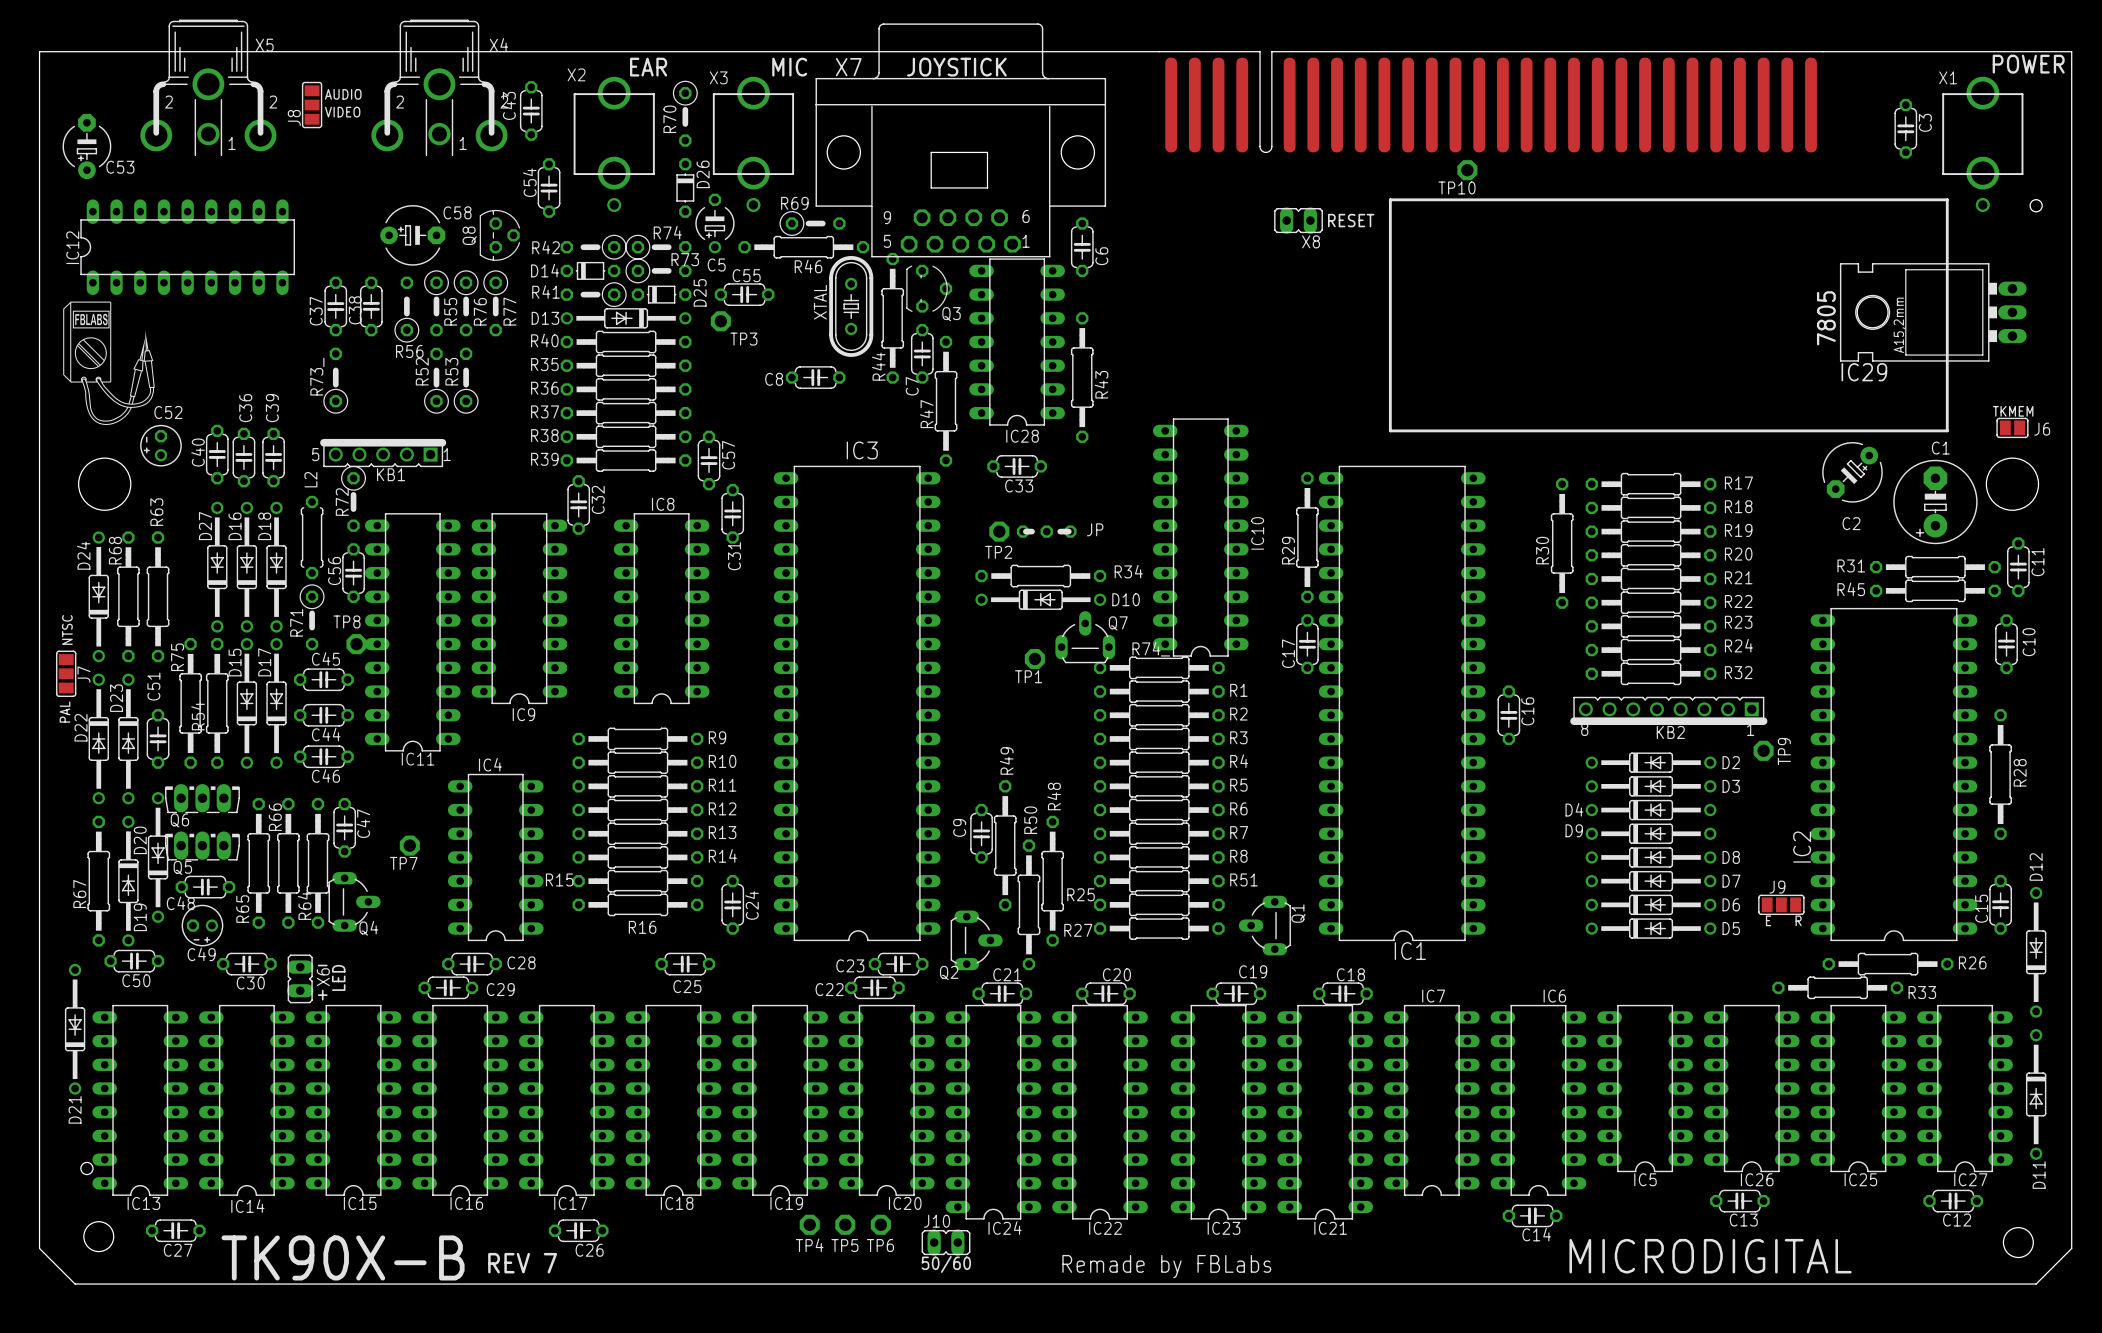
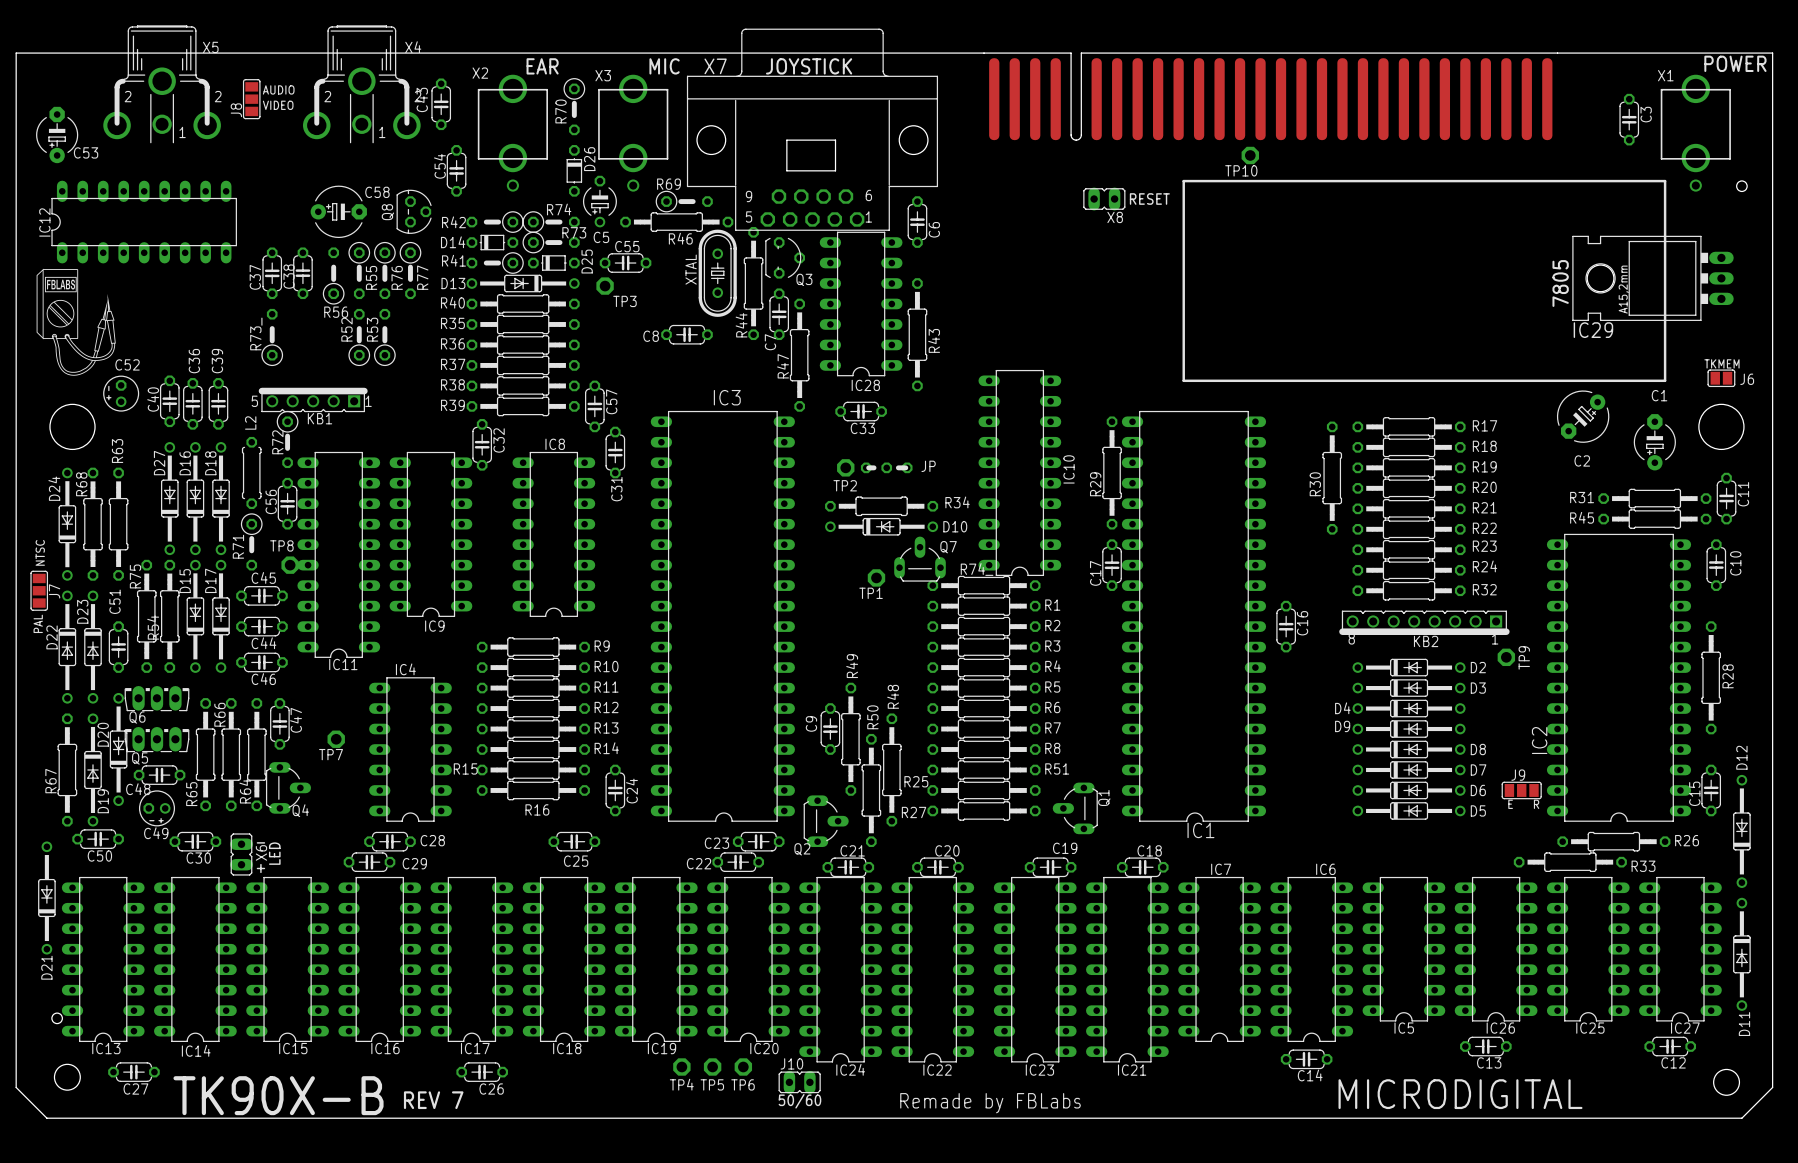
C1 footprint: [1893, 459, 1978, 545] -> [1633, 414, 1676, 471]

